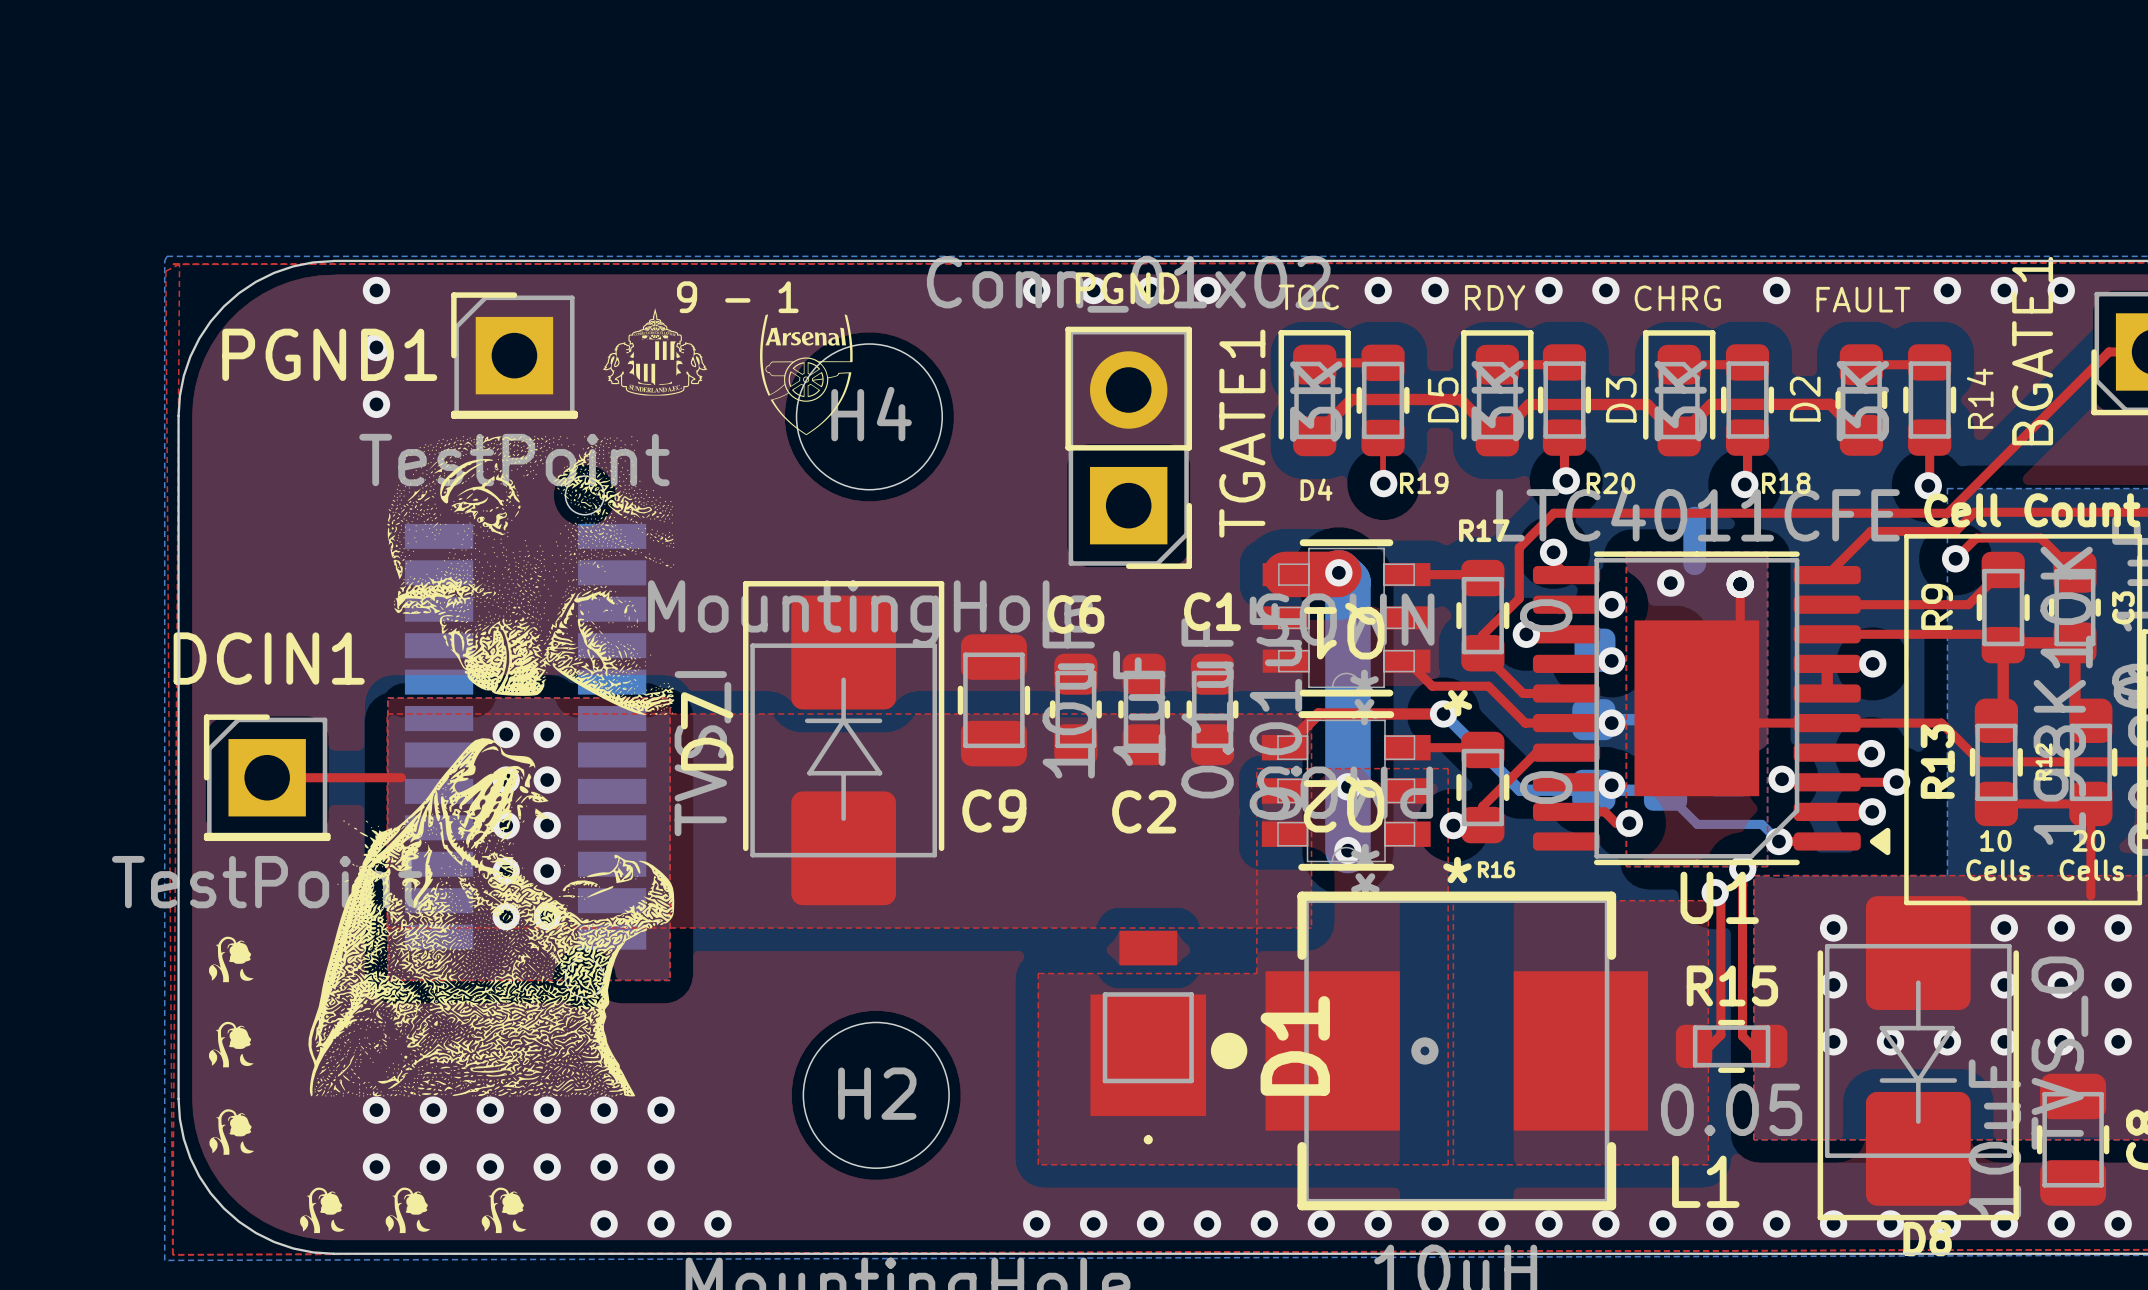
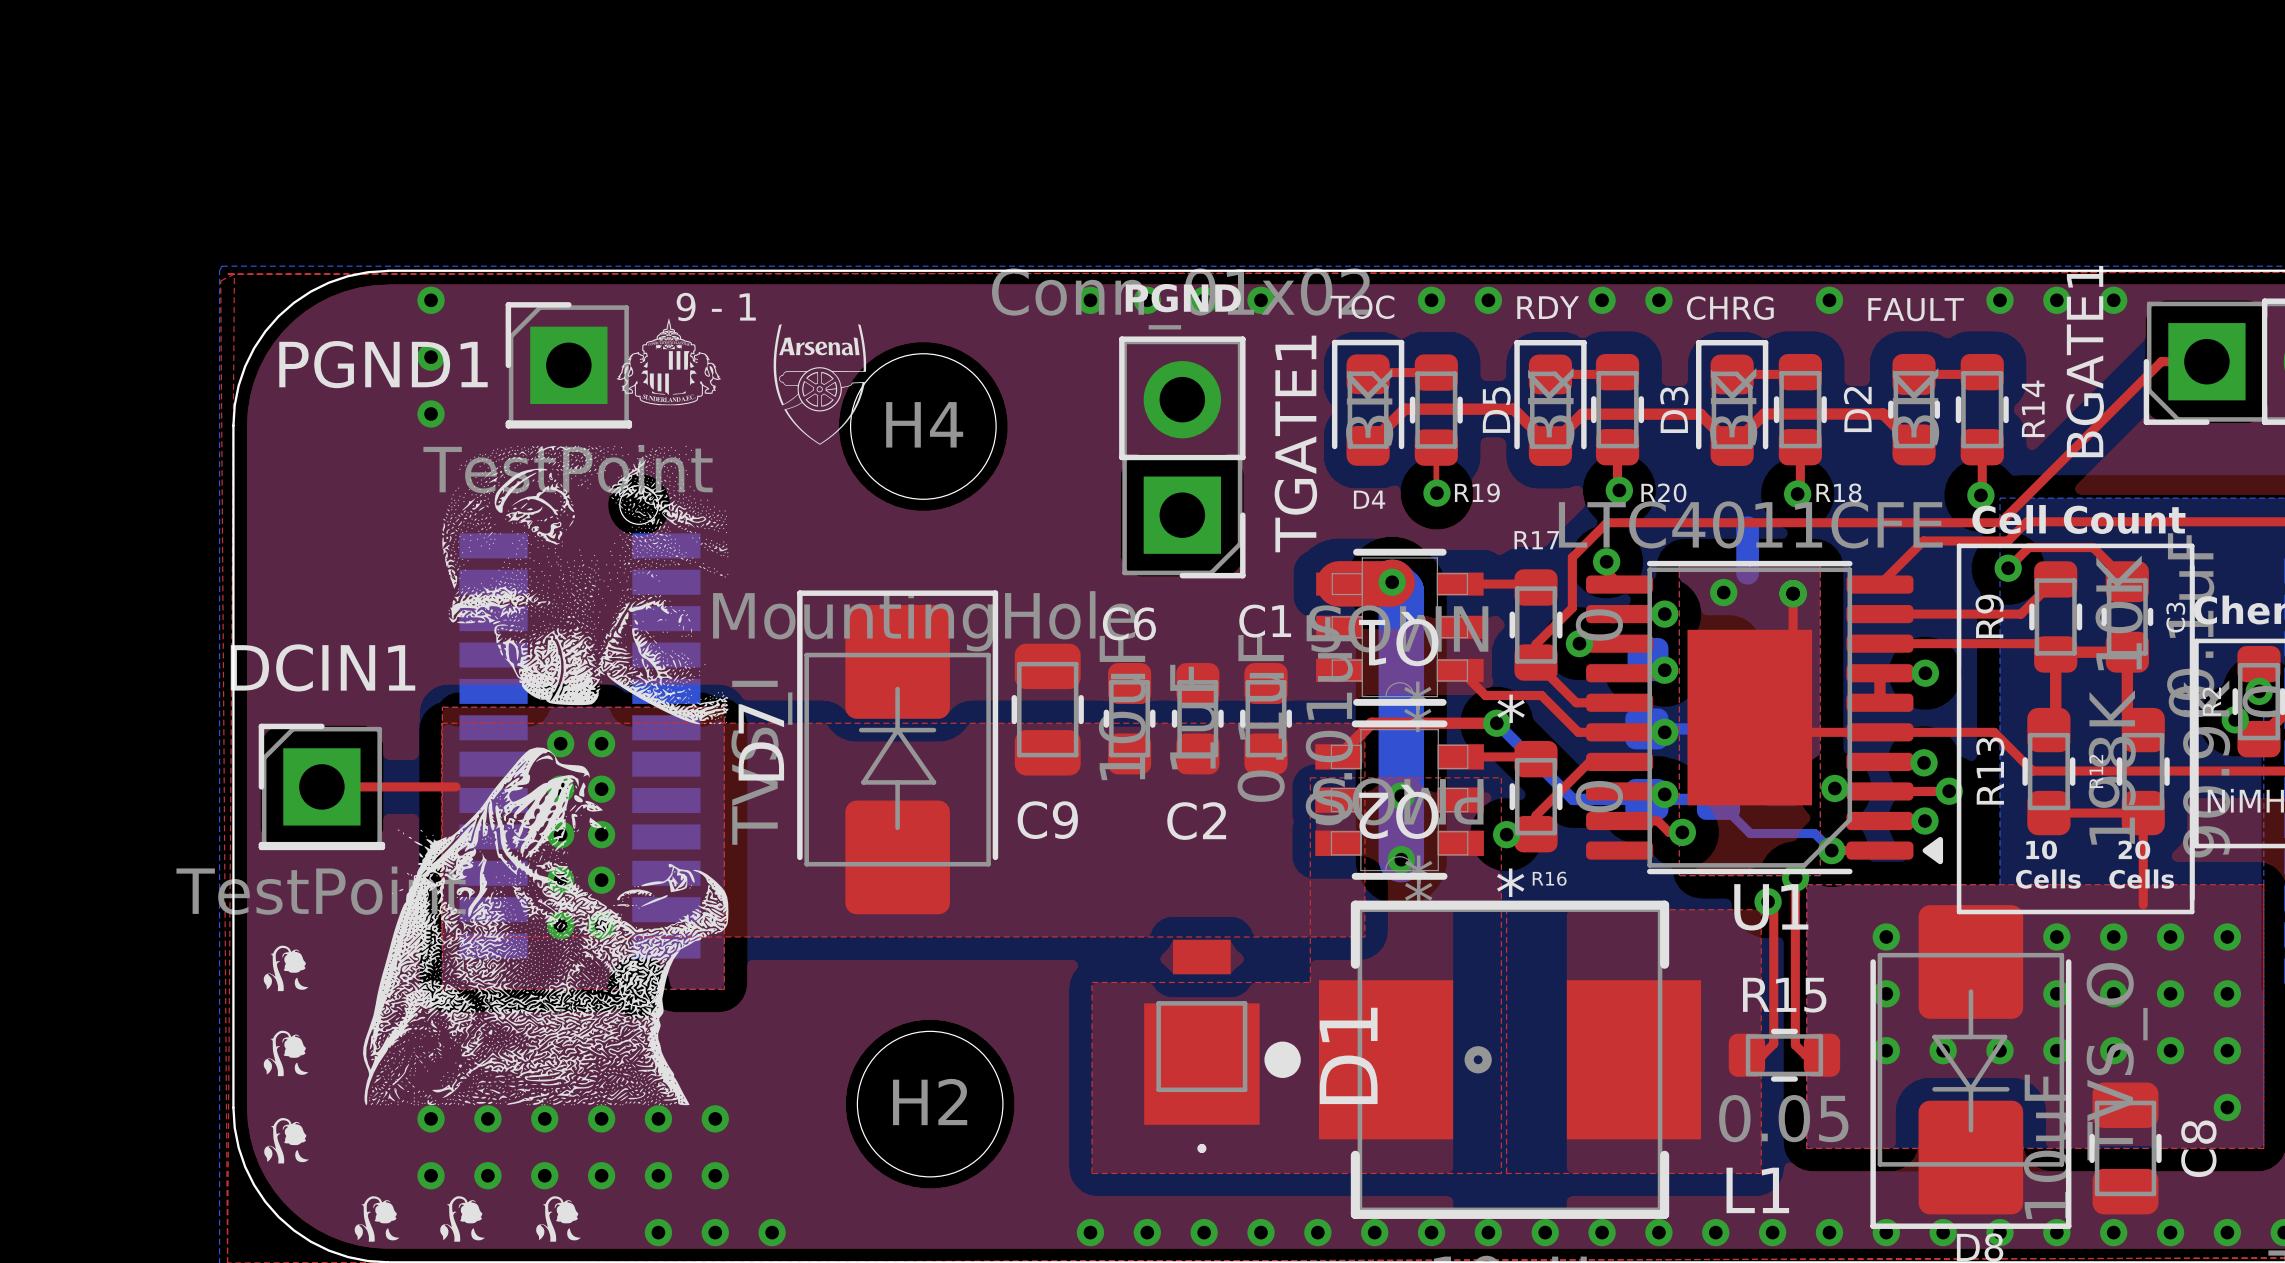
text position: 9 - 1 (737, 297) -> 9 - 1 (716, 306)
drawing position: (655, 351) -> (668, 361)
drawing position: (806, 374) -> (819, 384)

